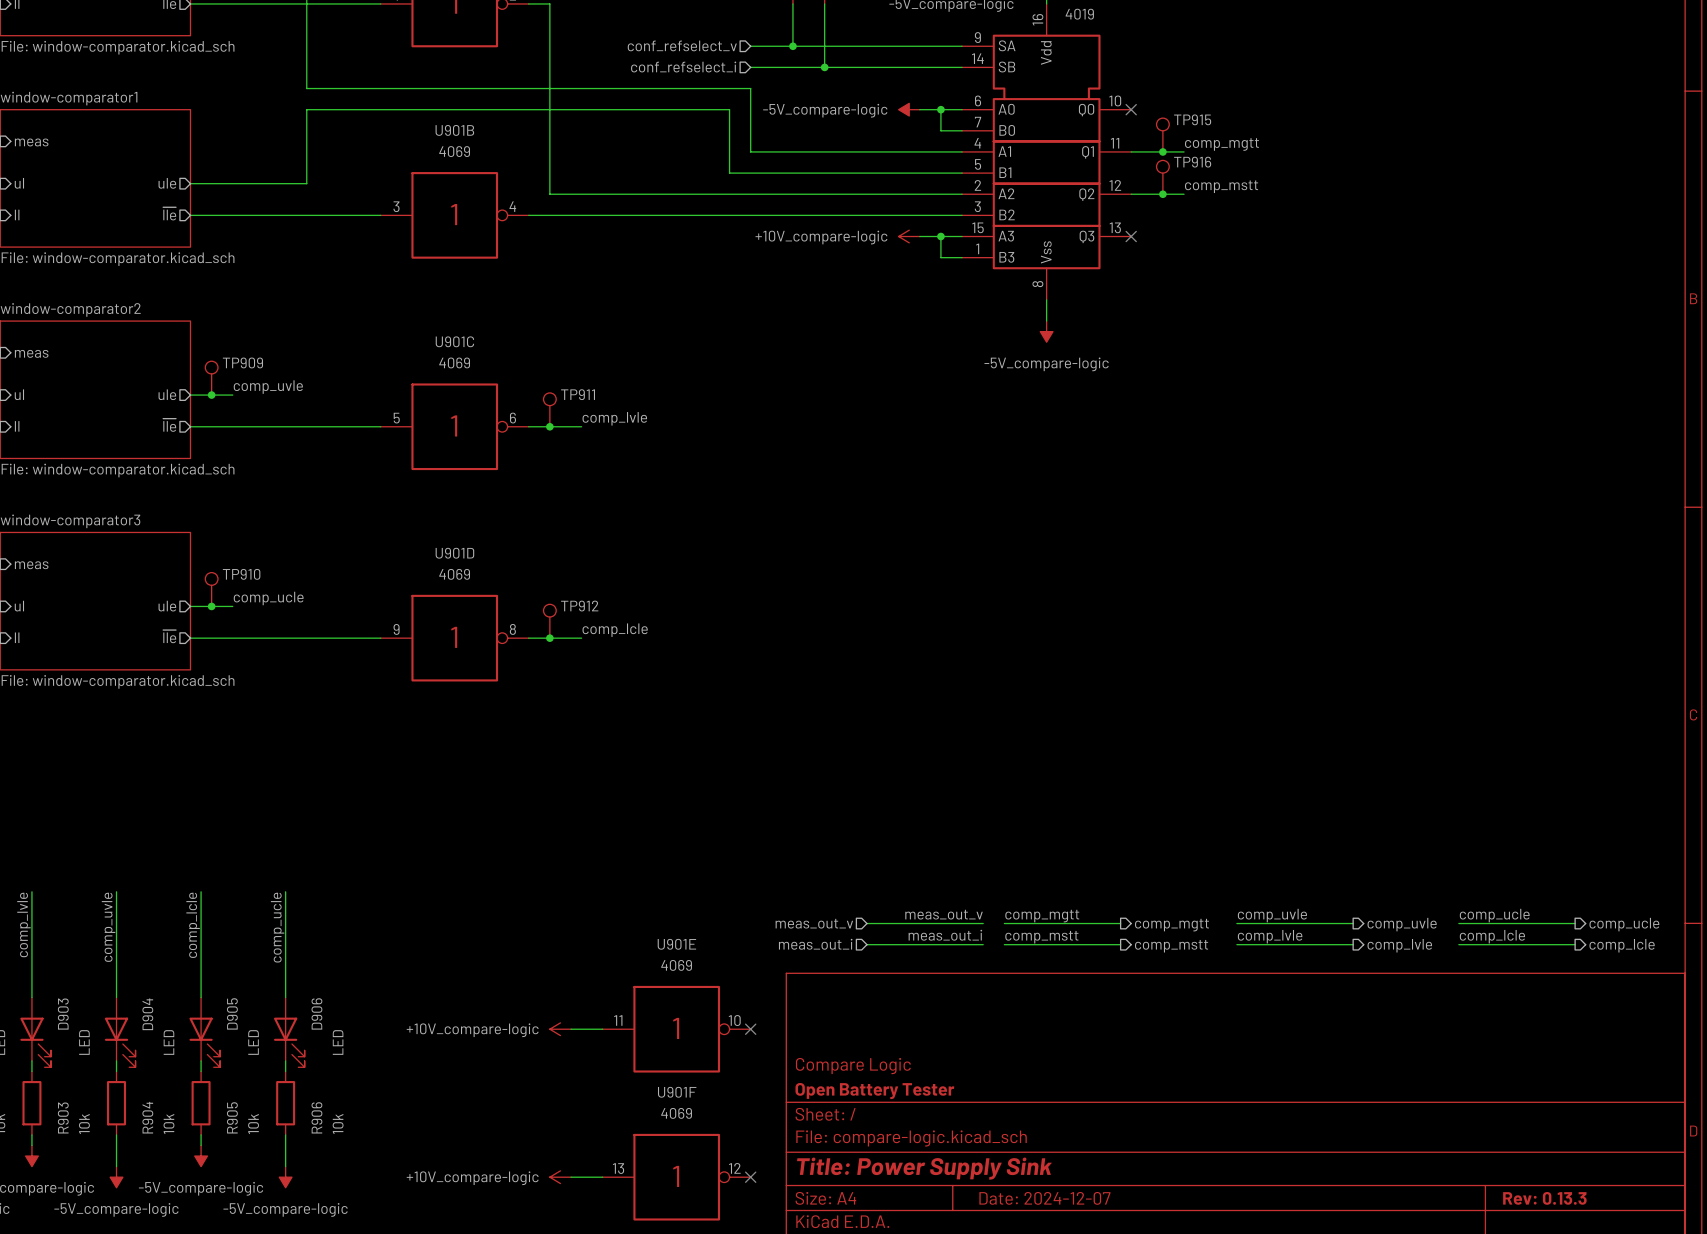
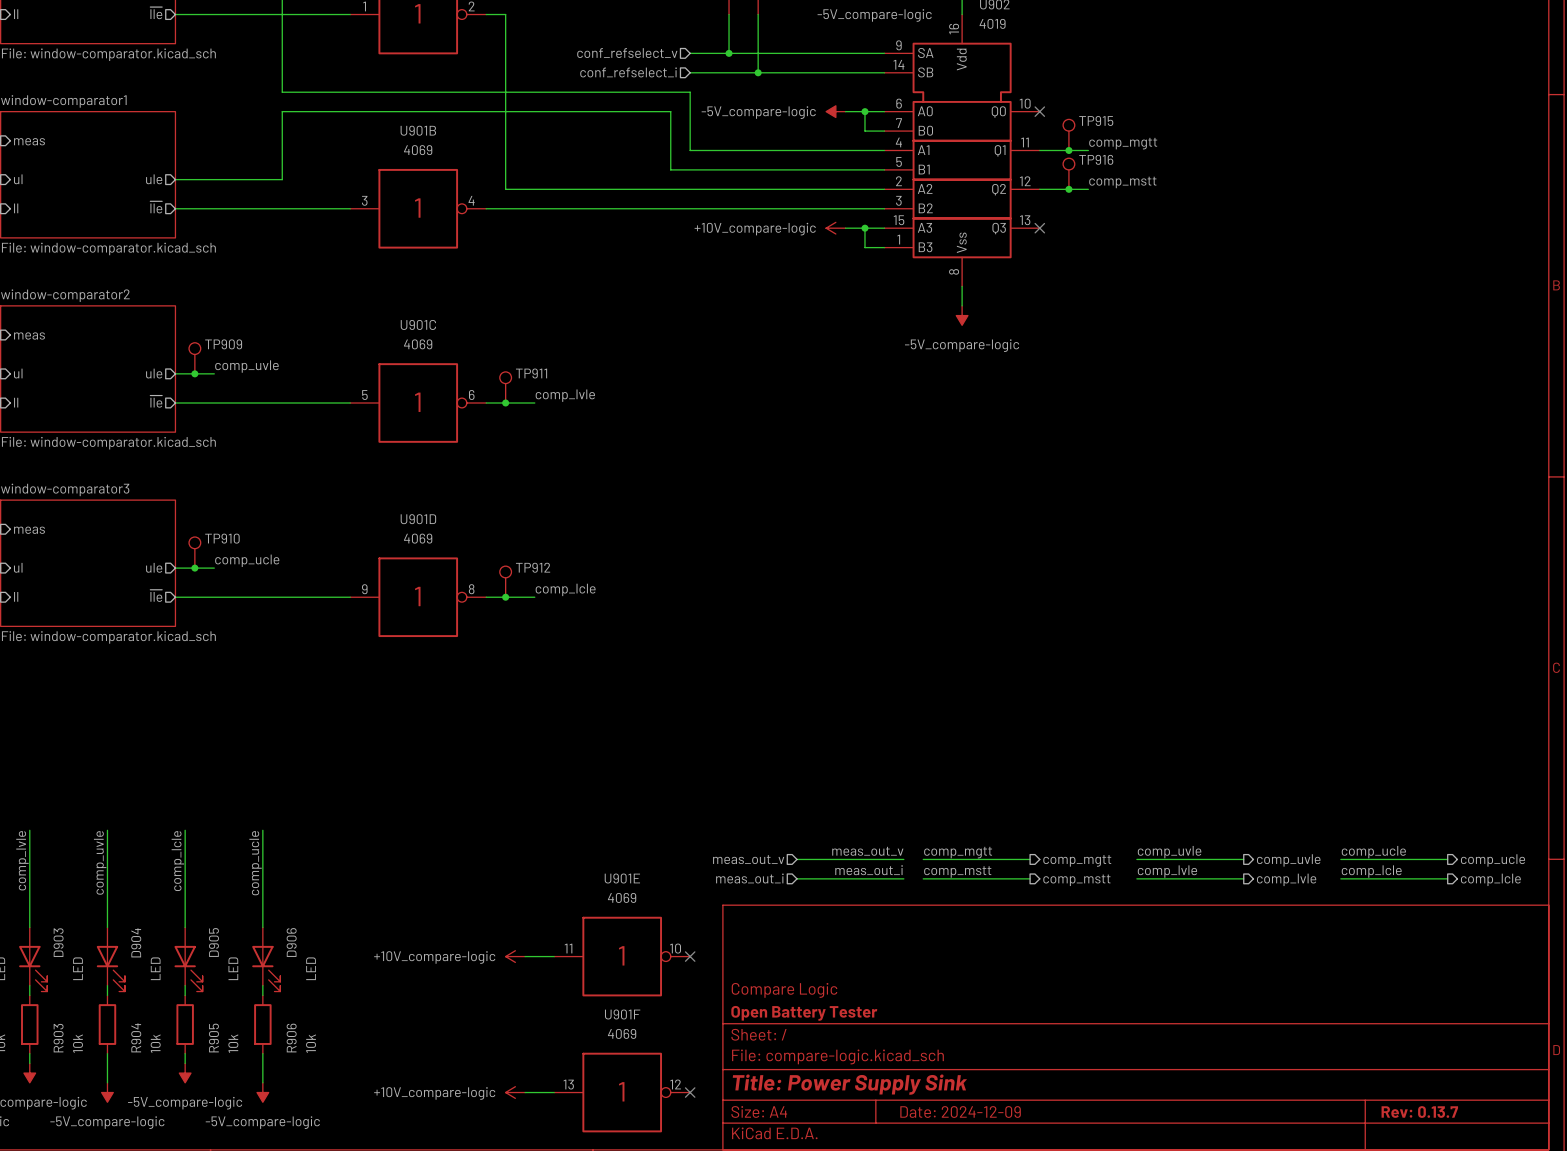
title block: Date: 2024-12-07 (1044, 1198) -> Date: 2024-12-09 (960, 1111)
title block: Rev: 0.13.3 (1544, 1198) -> Rev: 0.13.7 (1419, 1112)

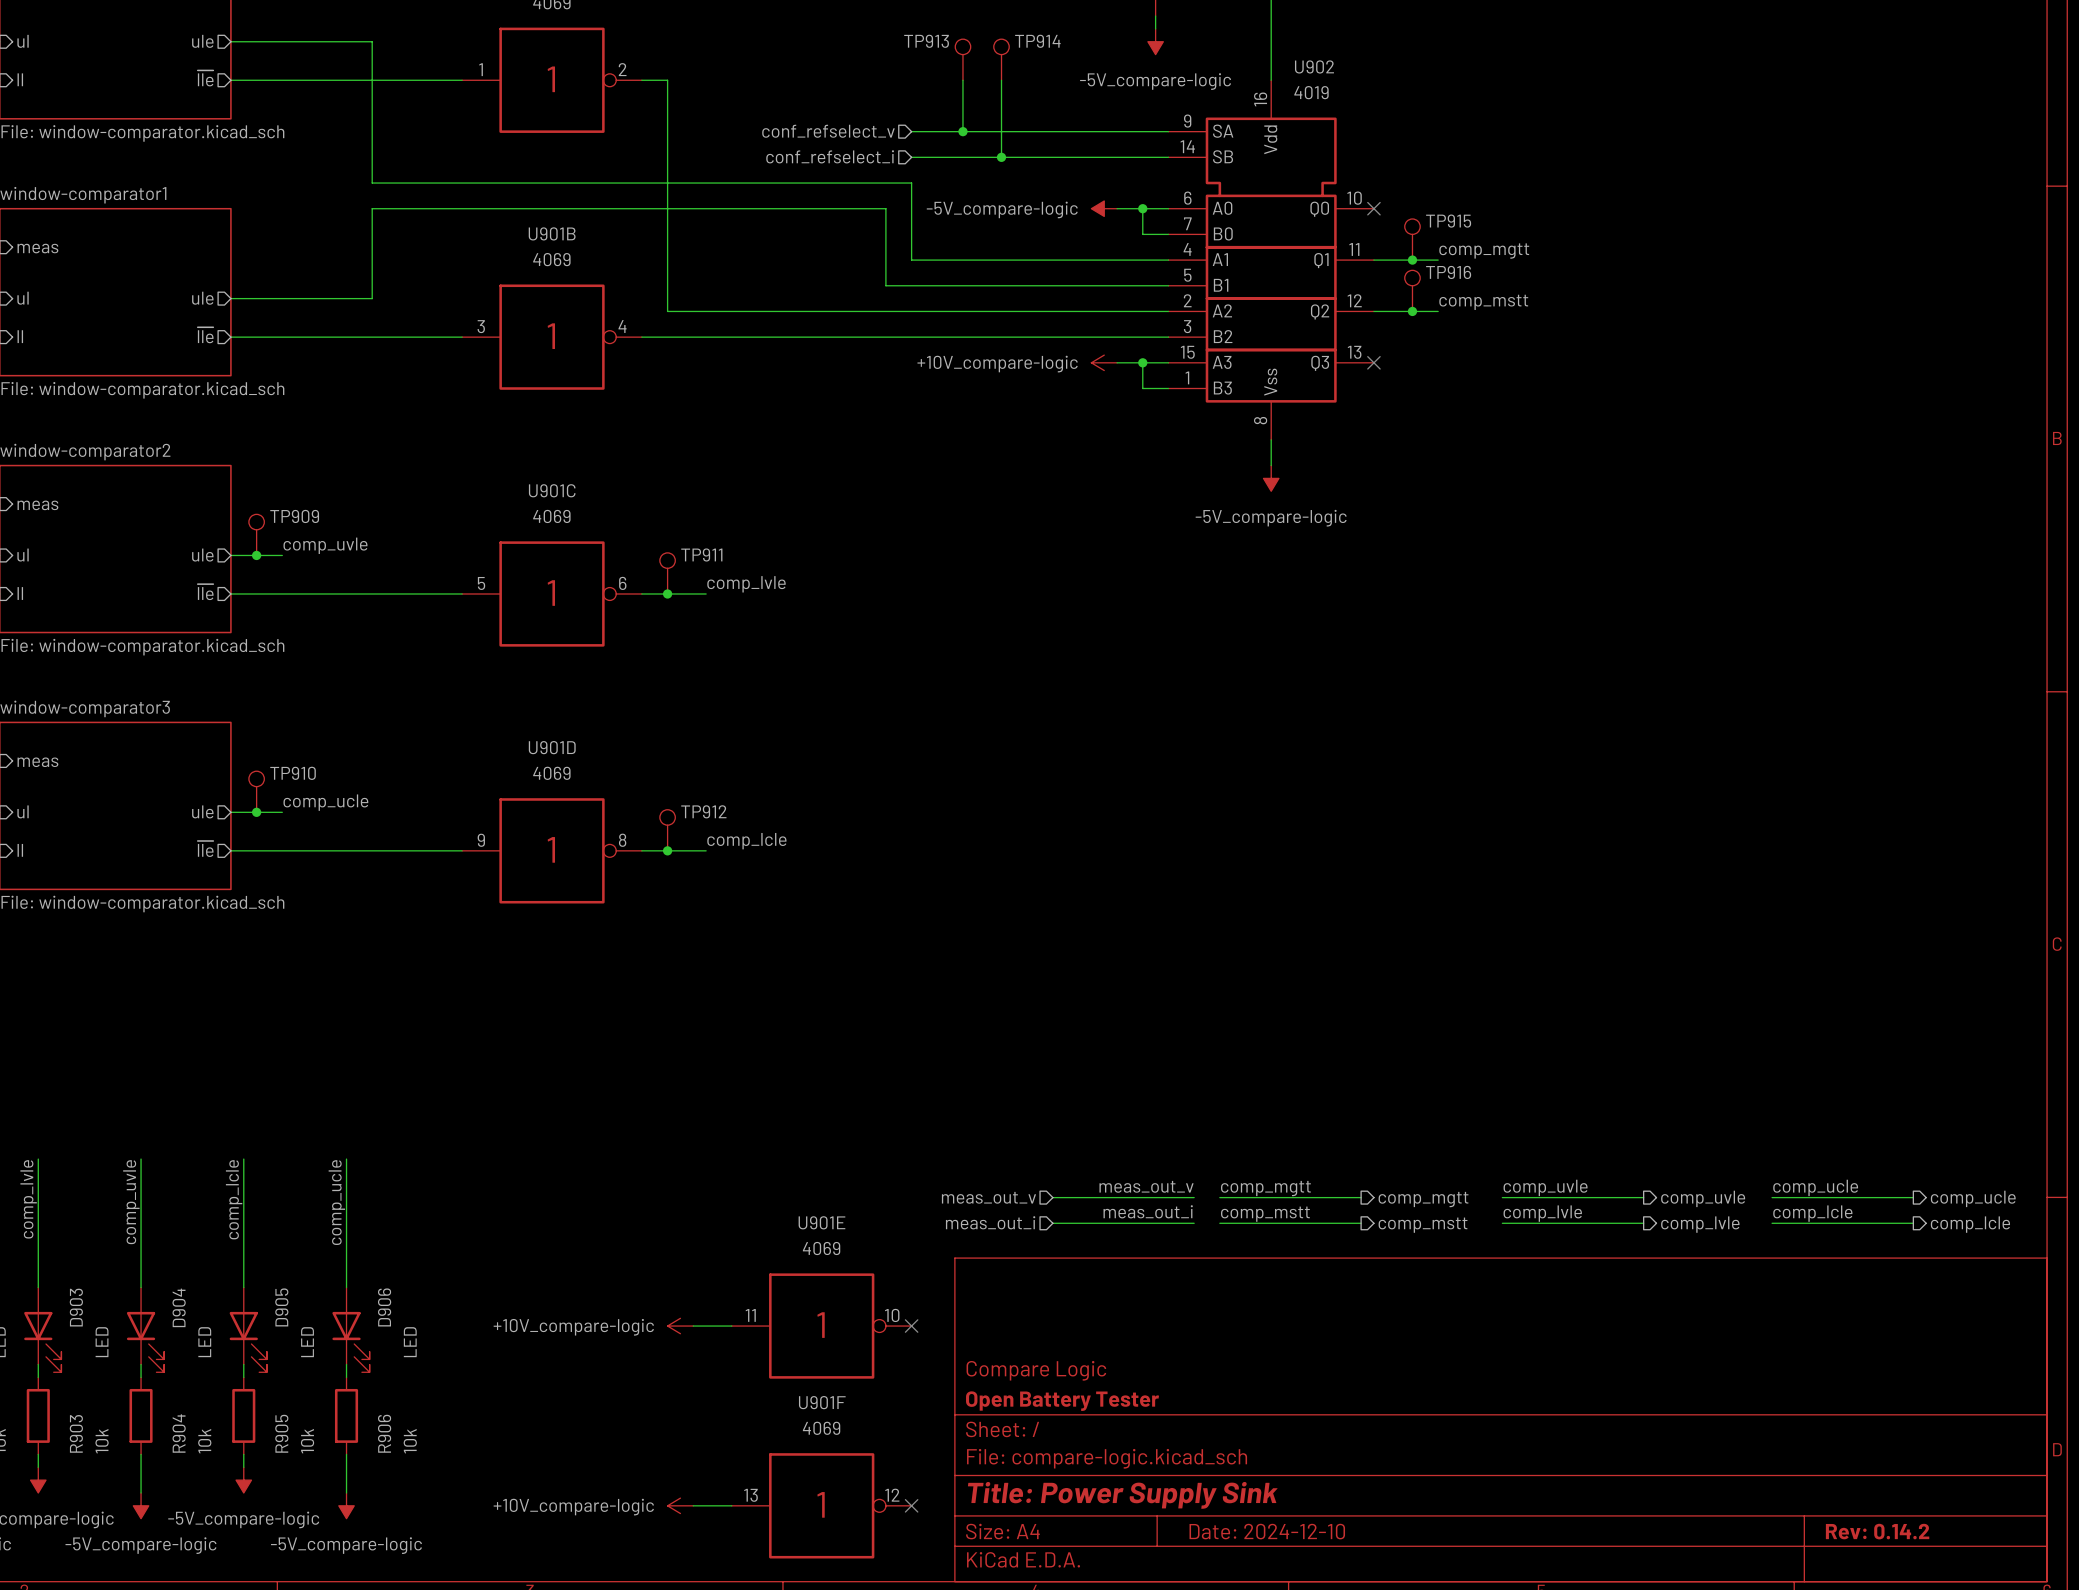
title block: Date: 2024-12-09 (960, 1111) -> Date: 2024-12-10 (1267, 1531)
title block: Rev: 0.13.7 (1419, 1112) -> Rev: 0.14.2 (1877, 1531)

